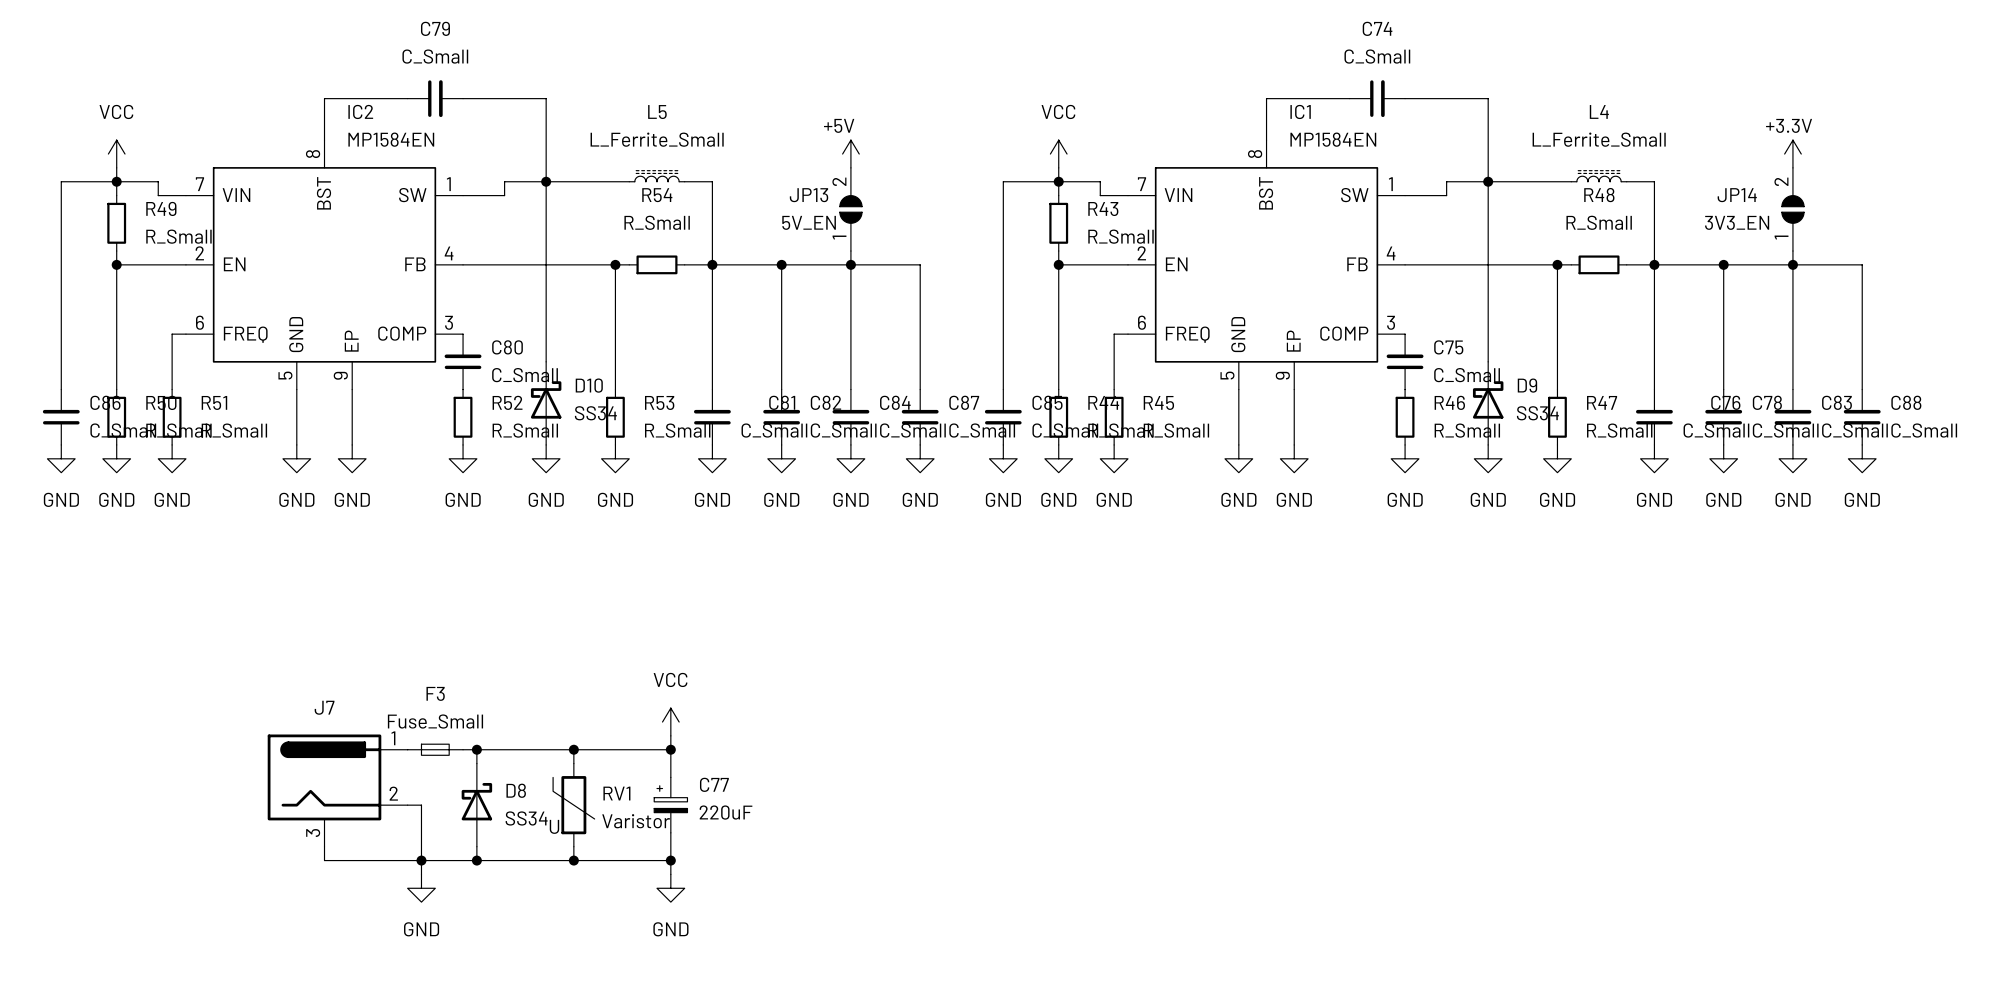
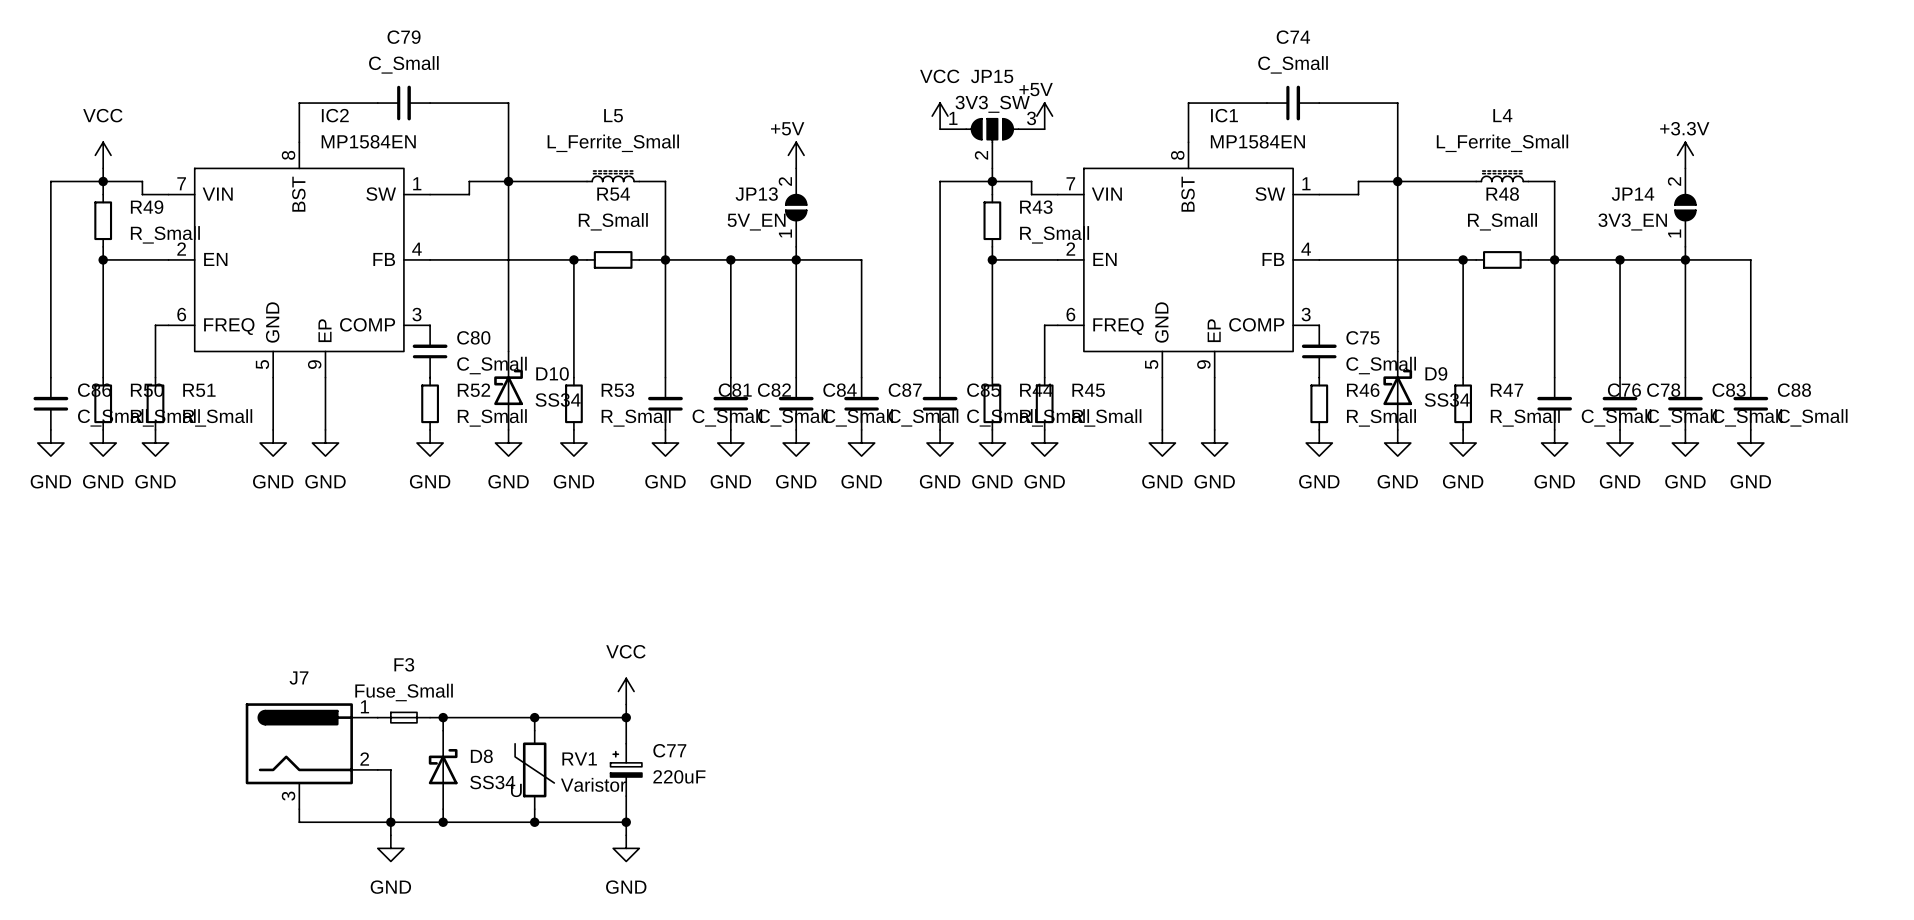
power symbol: none -> +5V (1044, 116)
JP15: none -> 3V3_SW (992, 143)
power symbol position: VCC (1058, 154) -> VCC (940, 116)

